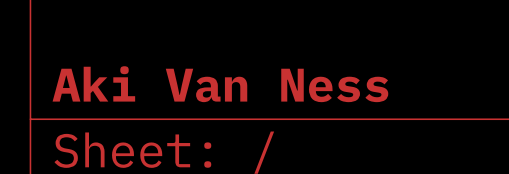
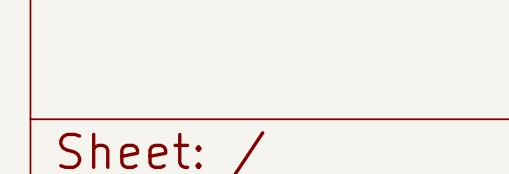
title block: Aki Van Ness (220, 84) -> none

